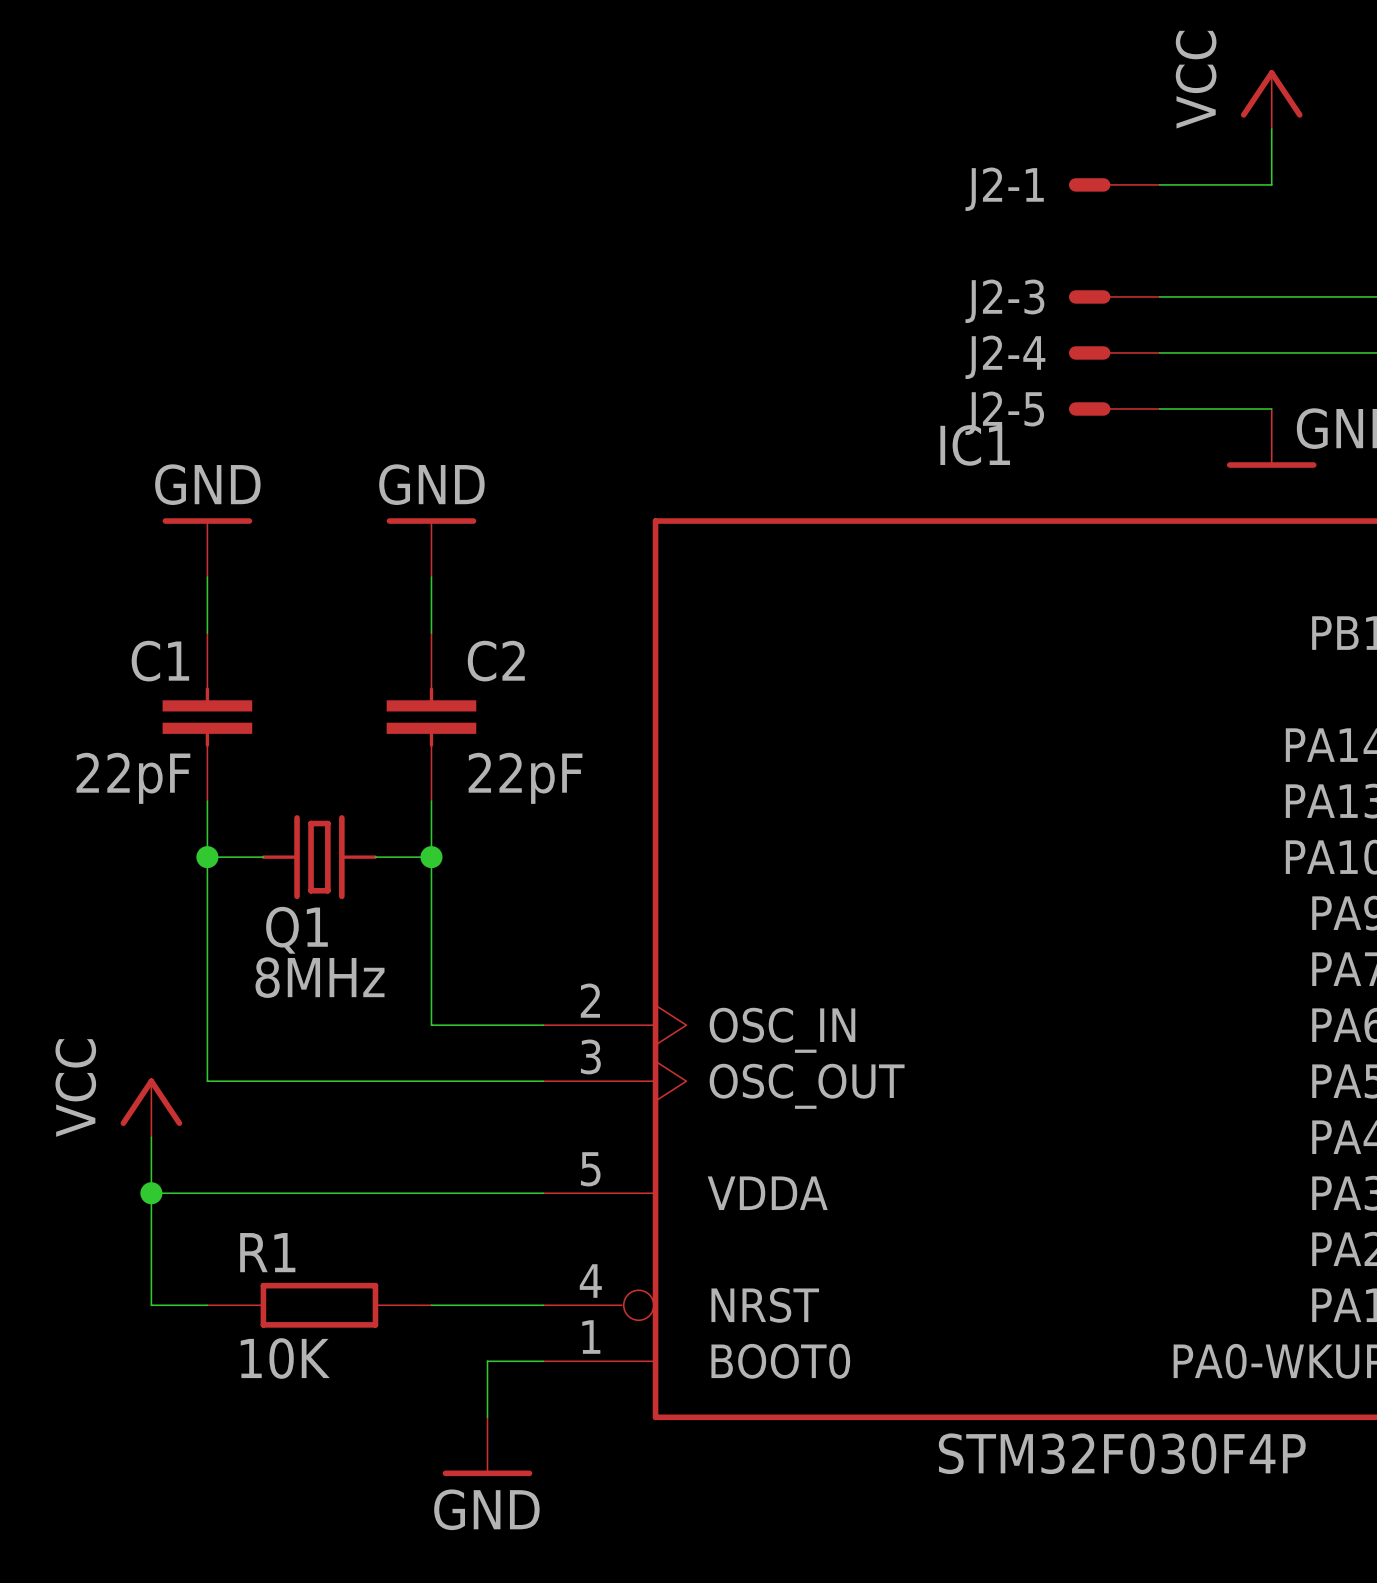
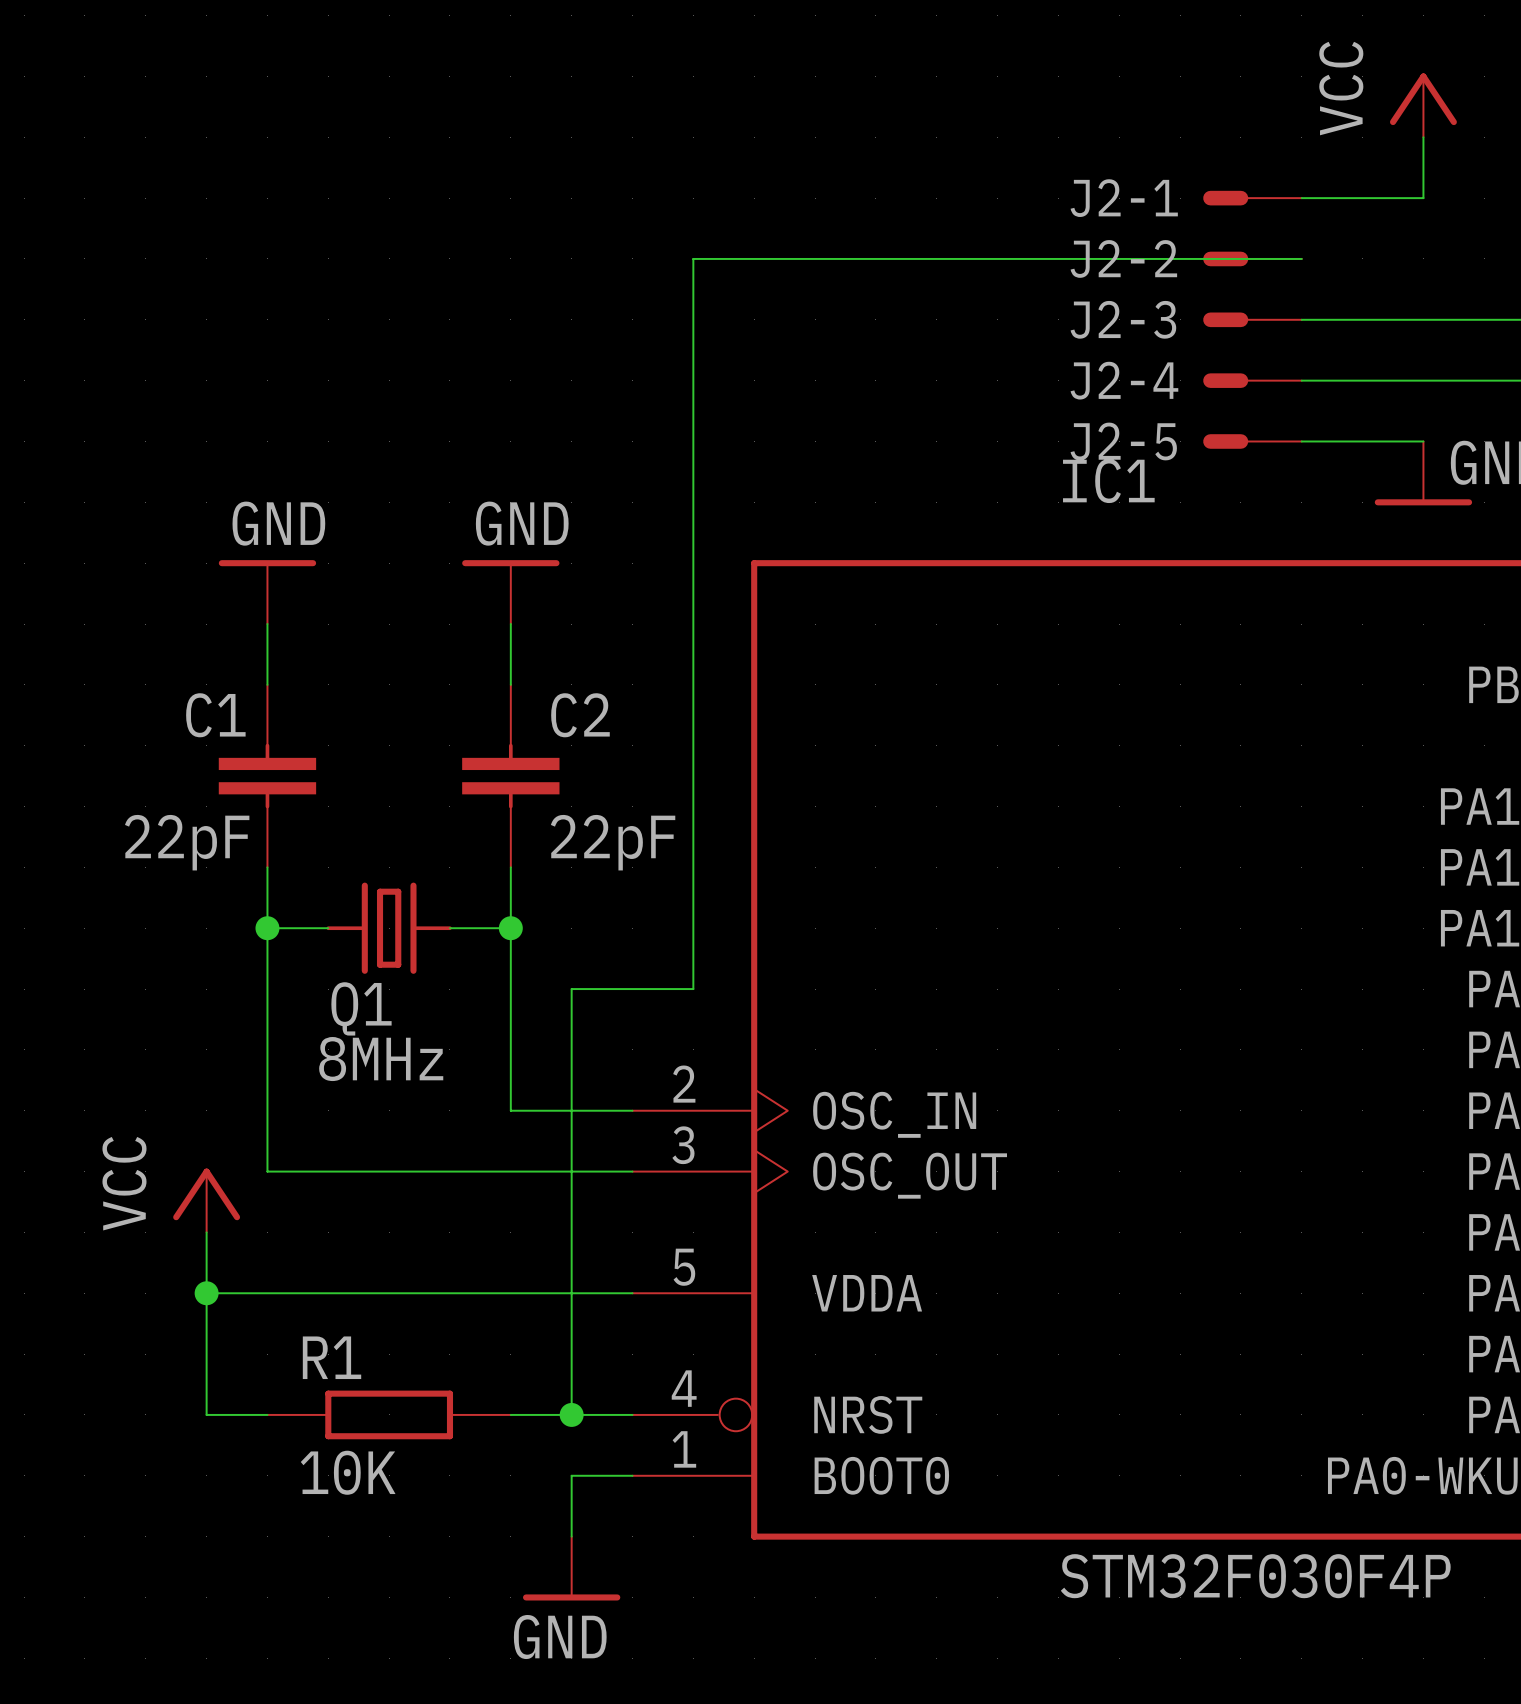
J2-2: none -> (1252, 258)
wire: none -> (1301, 258) (693, 258) (693, 989) (571, 989) (571, 1414)
junction: none -> (571, 1414)

